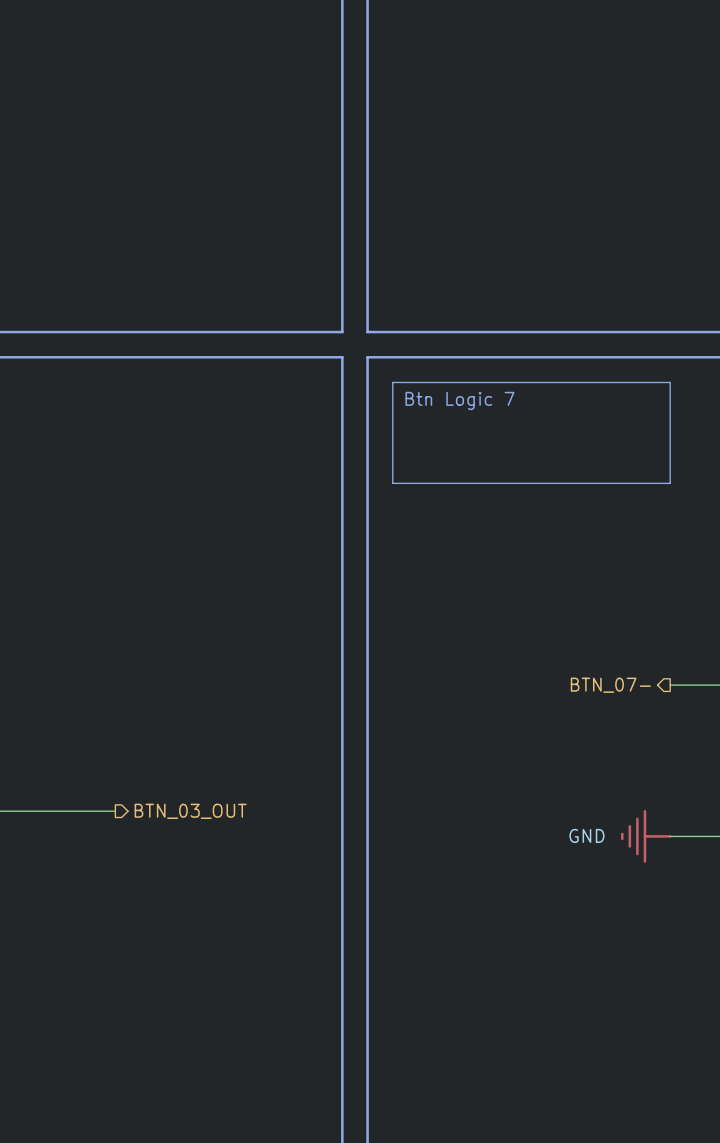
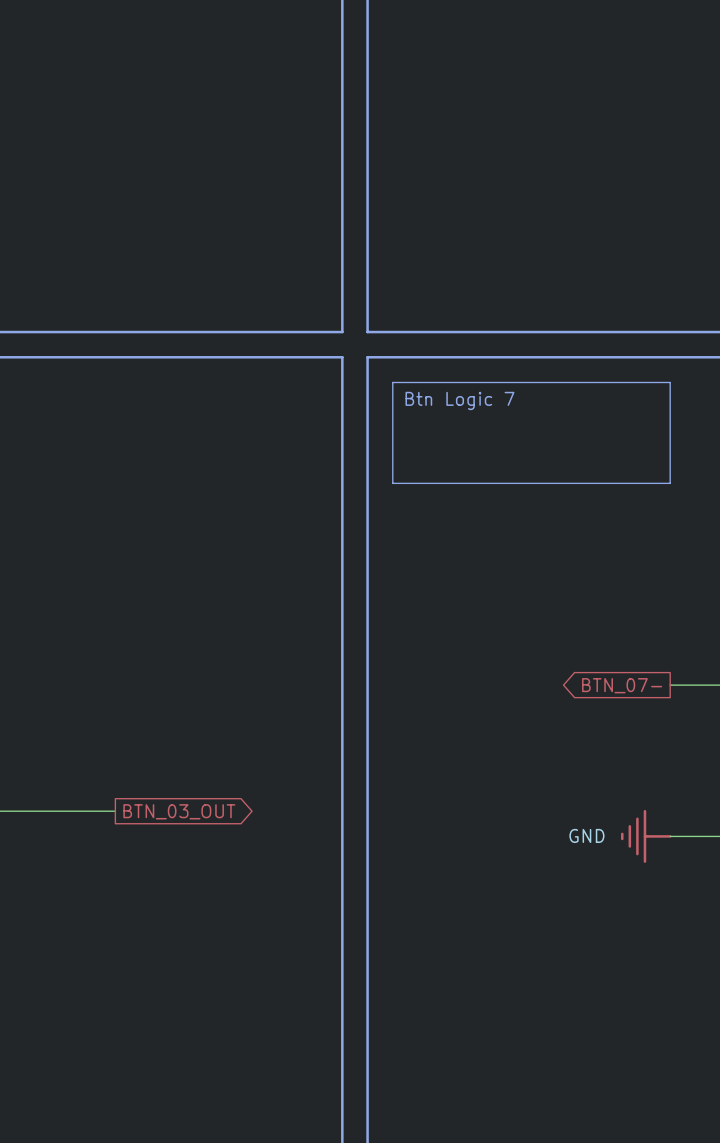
hierarchical label: BTN_07- (610, 685) -> none
global label: none -> BTN_07- (622, 685)
global label: none -> BTN_03_OUT (179, 811)
hierarchical label: BTN_03_OUT (190, 811) -> none

